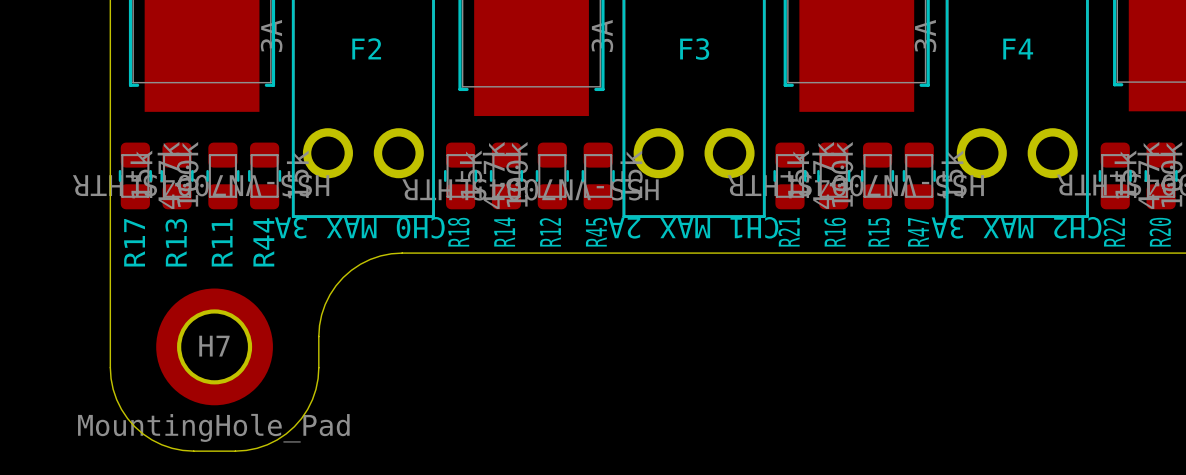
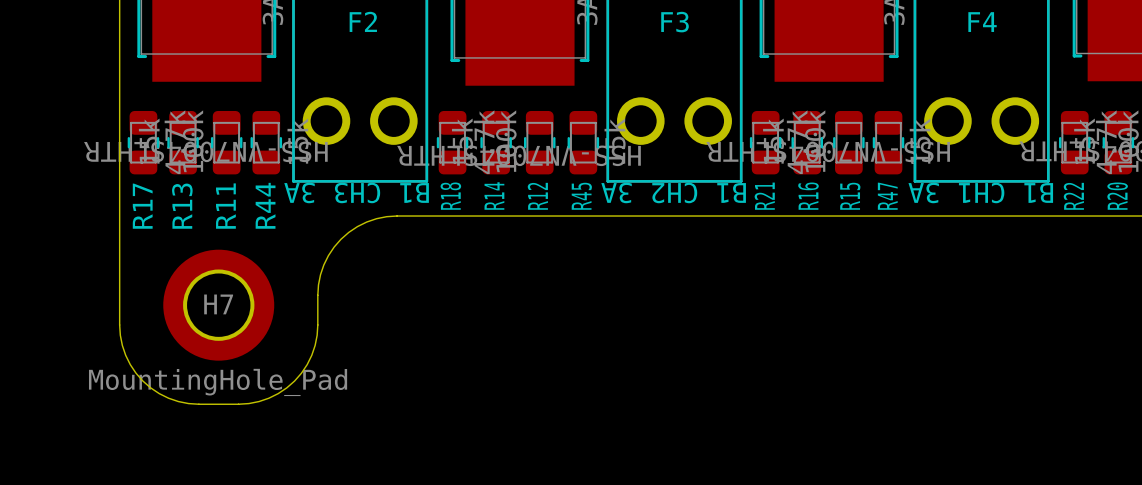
text: CH0 MAX 3A (359, 227) -> B1 CH3 3A (356, 192)
text: CH1 MAX 2A (693, 227) -> B1 CH2 3A (673, 192)
text: CH2 MAX 3A (1016, 227) -> B1 CH1 3A (980, 192)

